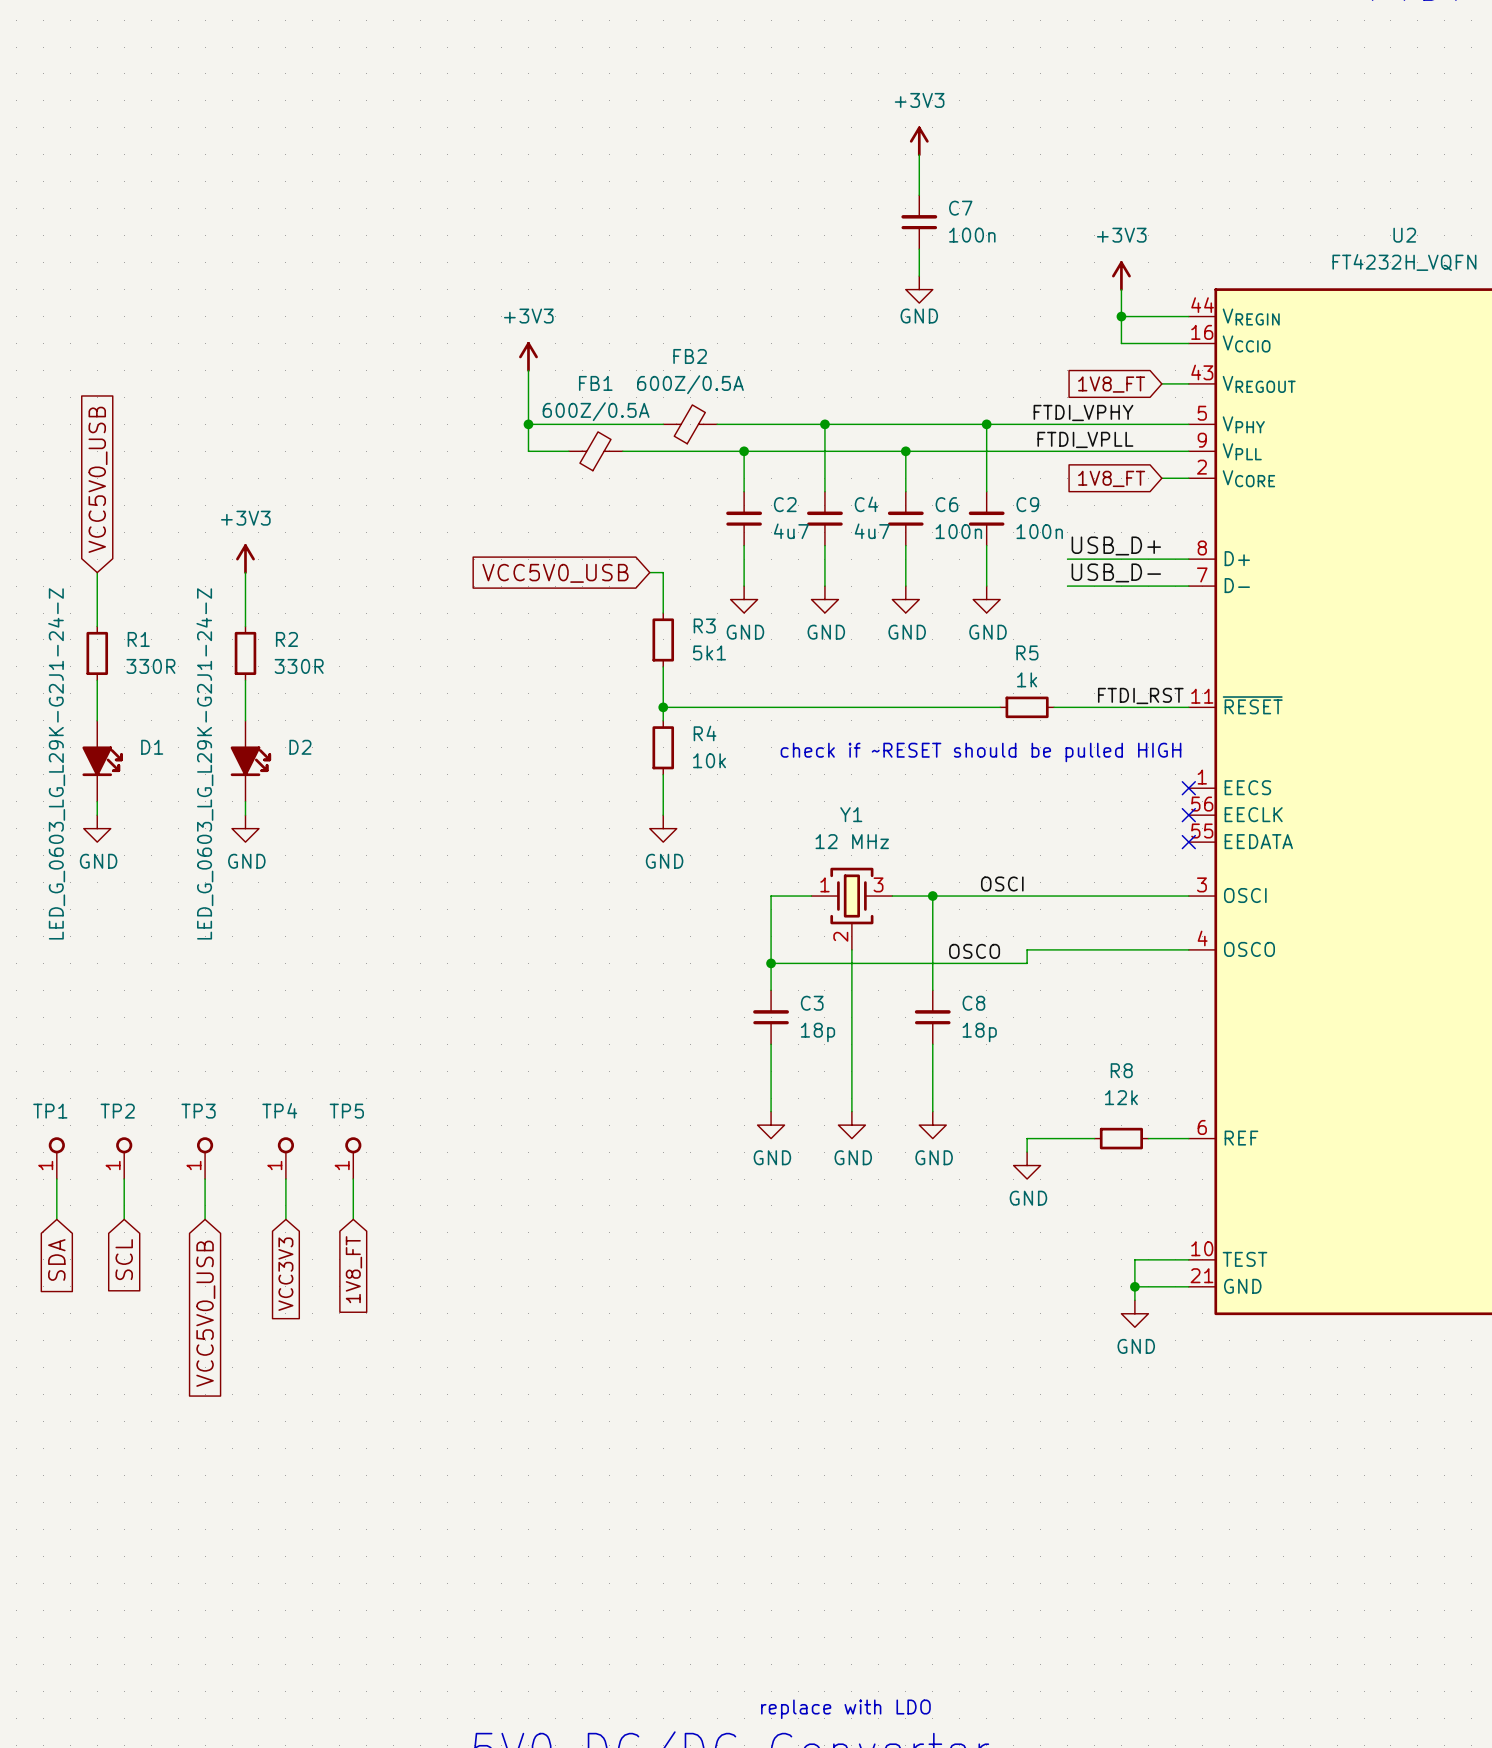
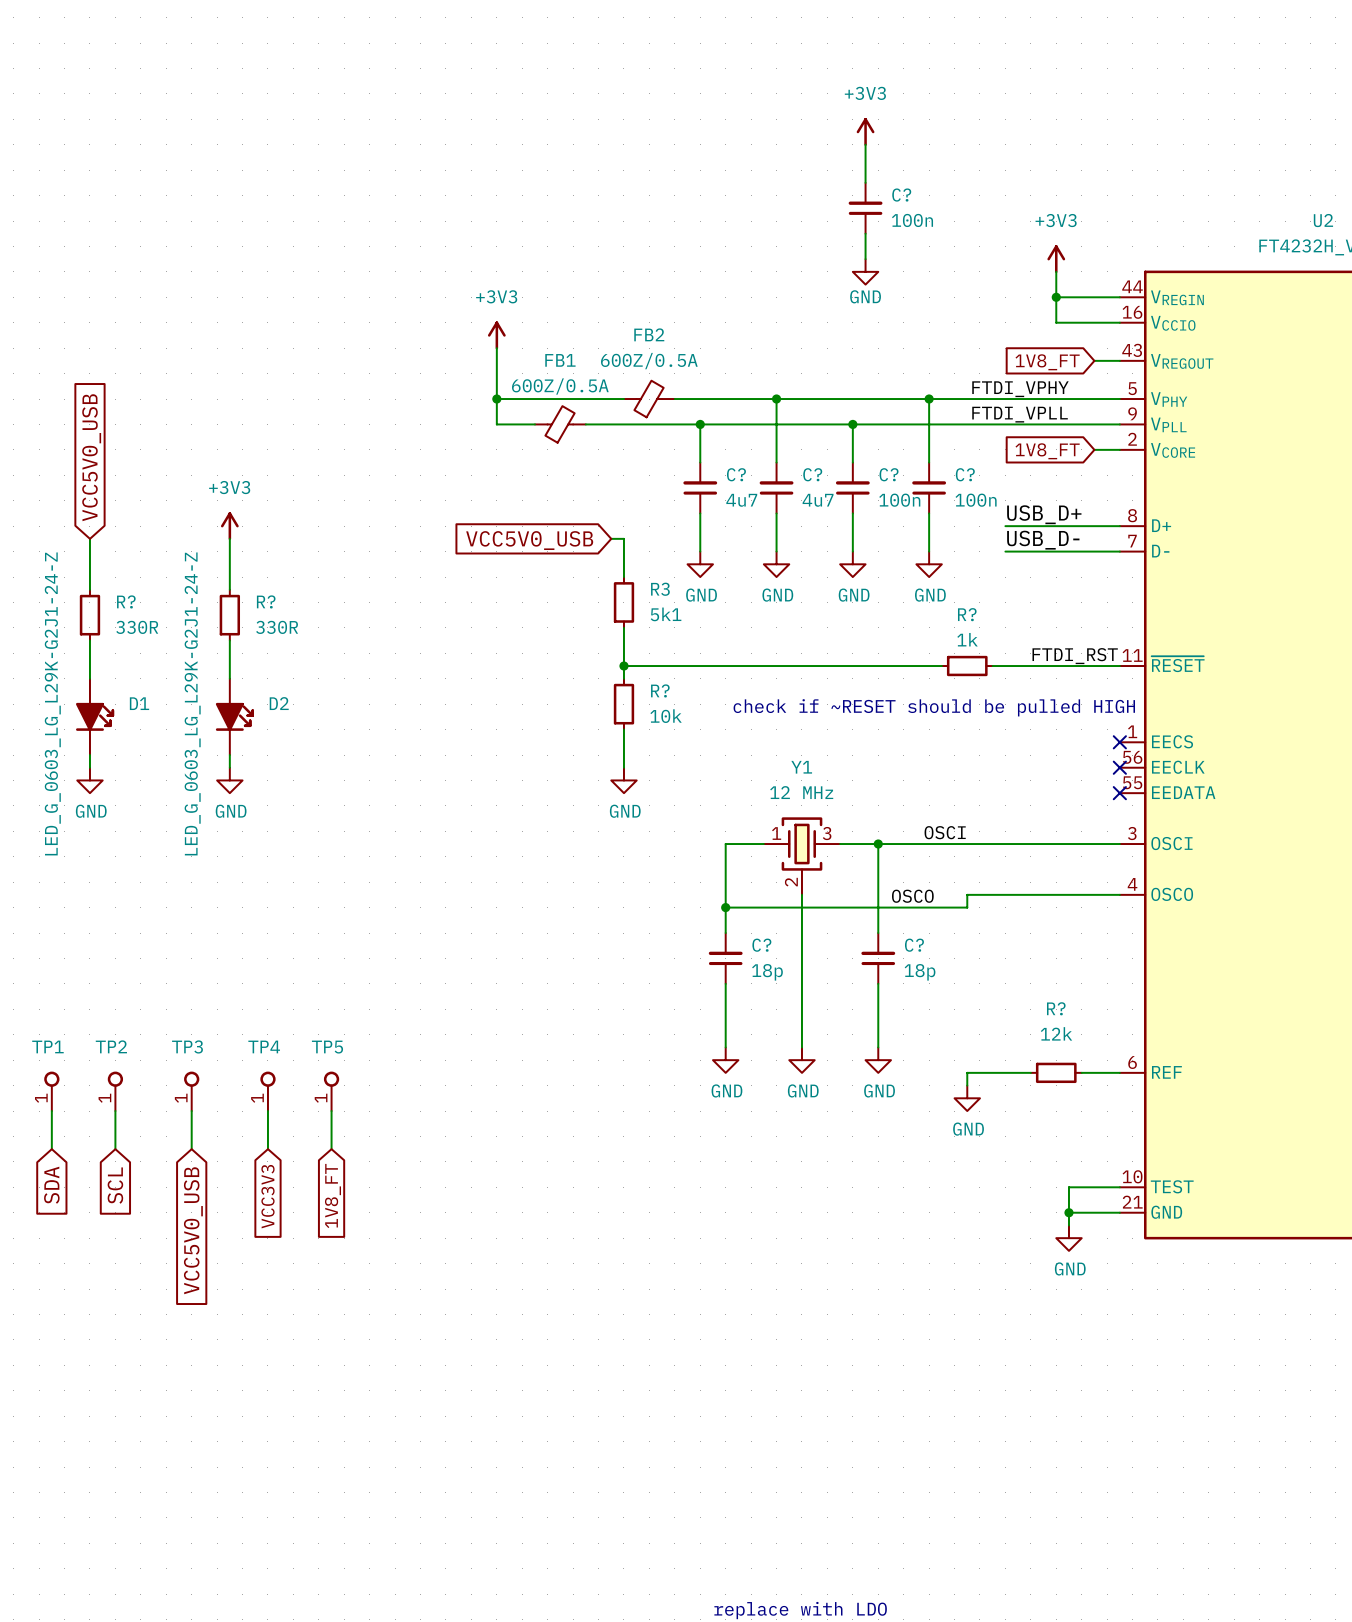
C7 name: C7 (960, 208) -> C? (901, 195)
C2 name: C2 (785, 504) -> C? (736, 474)
C4 name: C4 (866, 504) -> C? (812, 474)
C6 name: C6 (946, 504) -> C? (889, 474)
C9 name: C9 (1027, 504) -> C? (965, 474)
R1 name: R1 (138, 639) -> R? (126, 601)
R2 name: R2 (286, 639) -> R? (266, 601)
R5 name: R5 (1027, 652) -> R? (967, 614)
R4 name: R4 (705, 733) -> R? (660, 690)
C3 name: C3 (812, 1003) -> C? (761, 945)
C8 name: C8 (973, 1003) -> C? (914, 945)
R8 name: R8 (1121, 1070) -> R? (1056, 1008)

